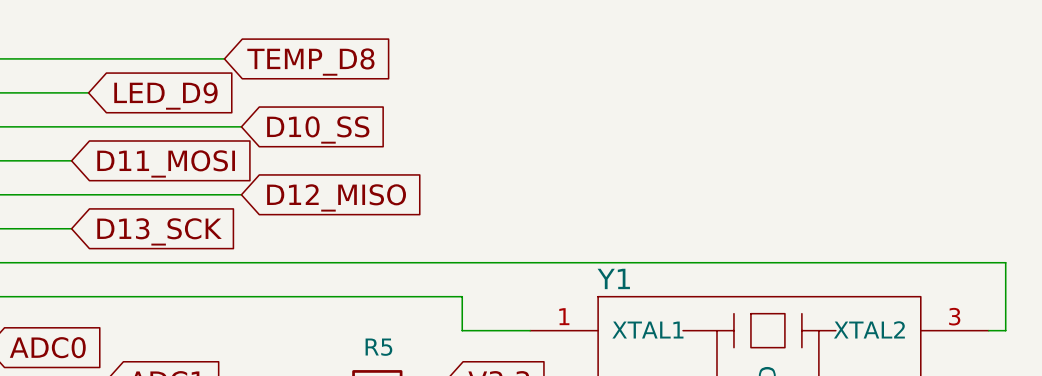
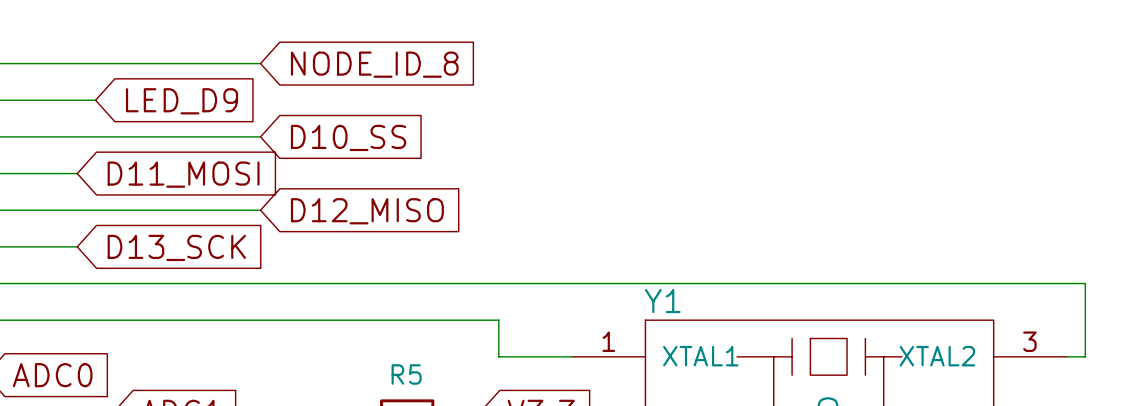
wire: none -> (242, 63) (260, 63)
global label: TEMP_D8 (310, 62) -> none
global label: none -> NODE_ID_8 (374, 64)

